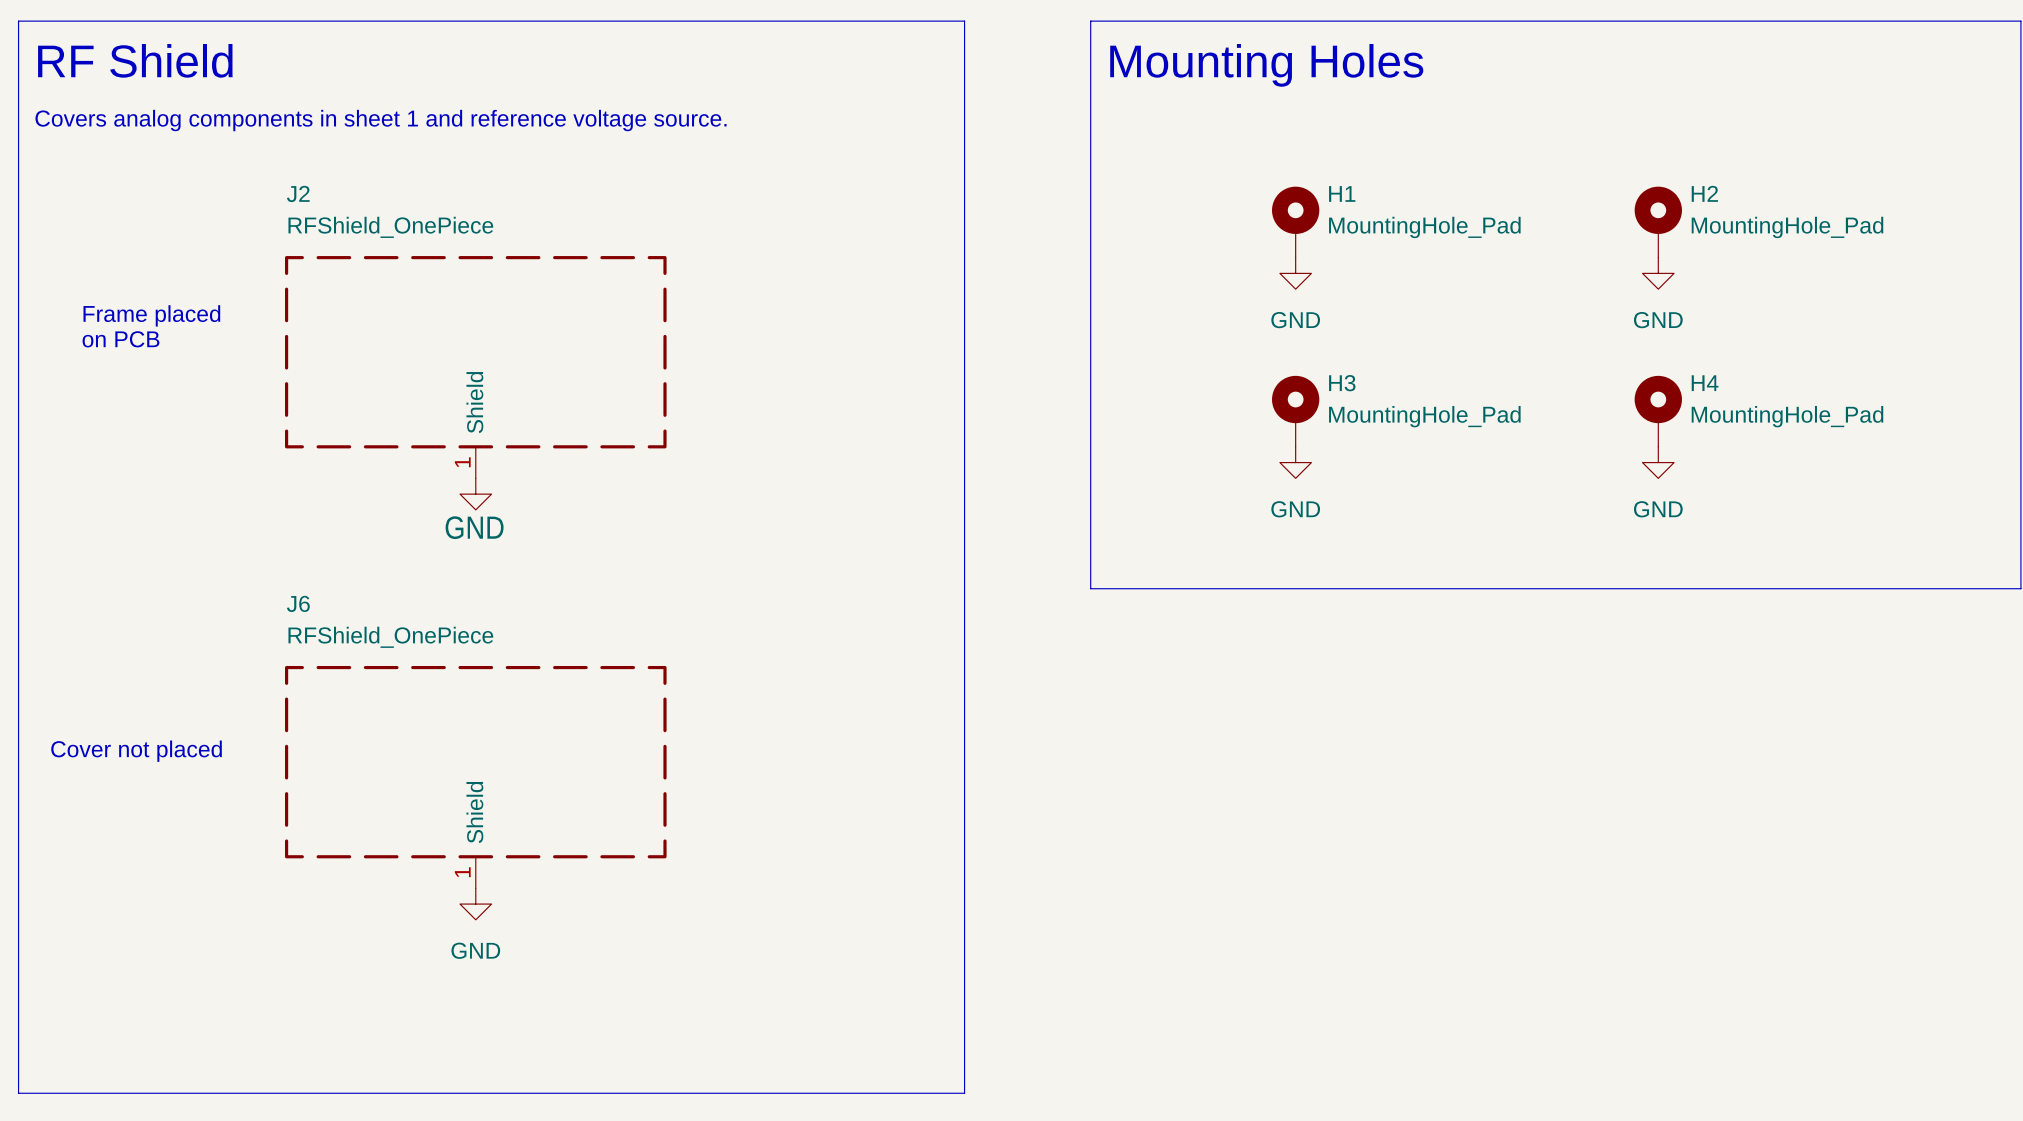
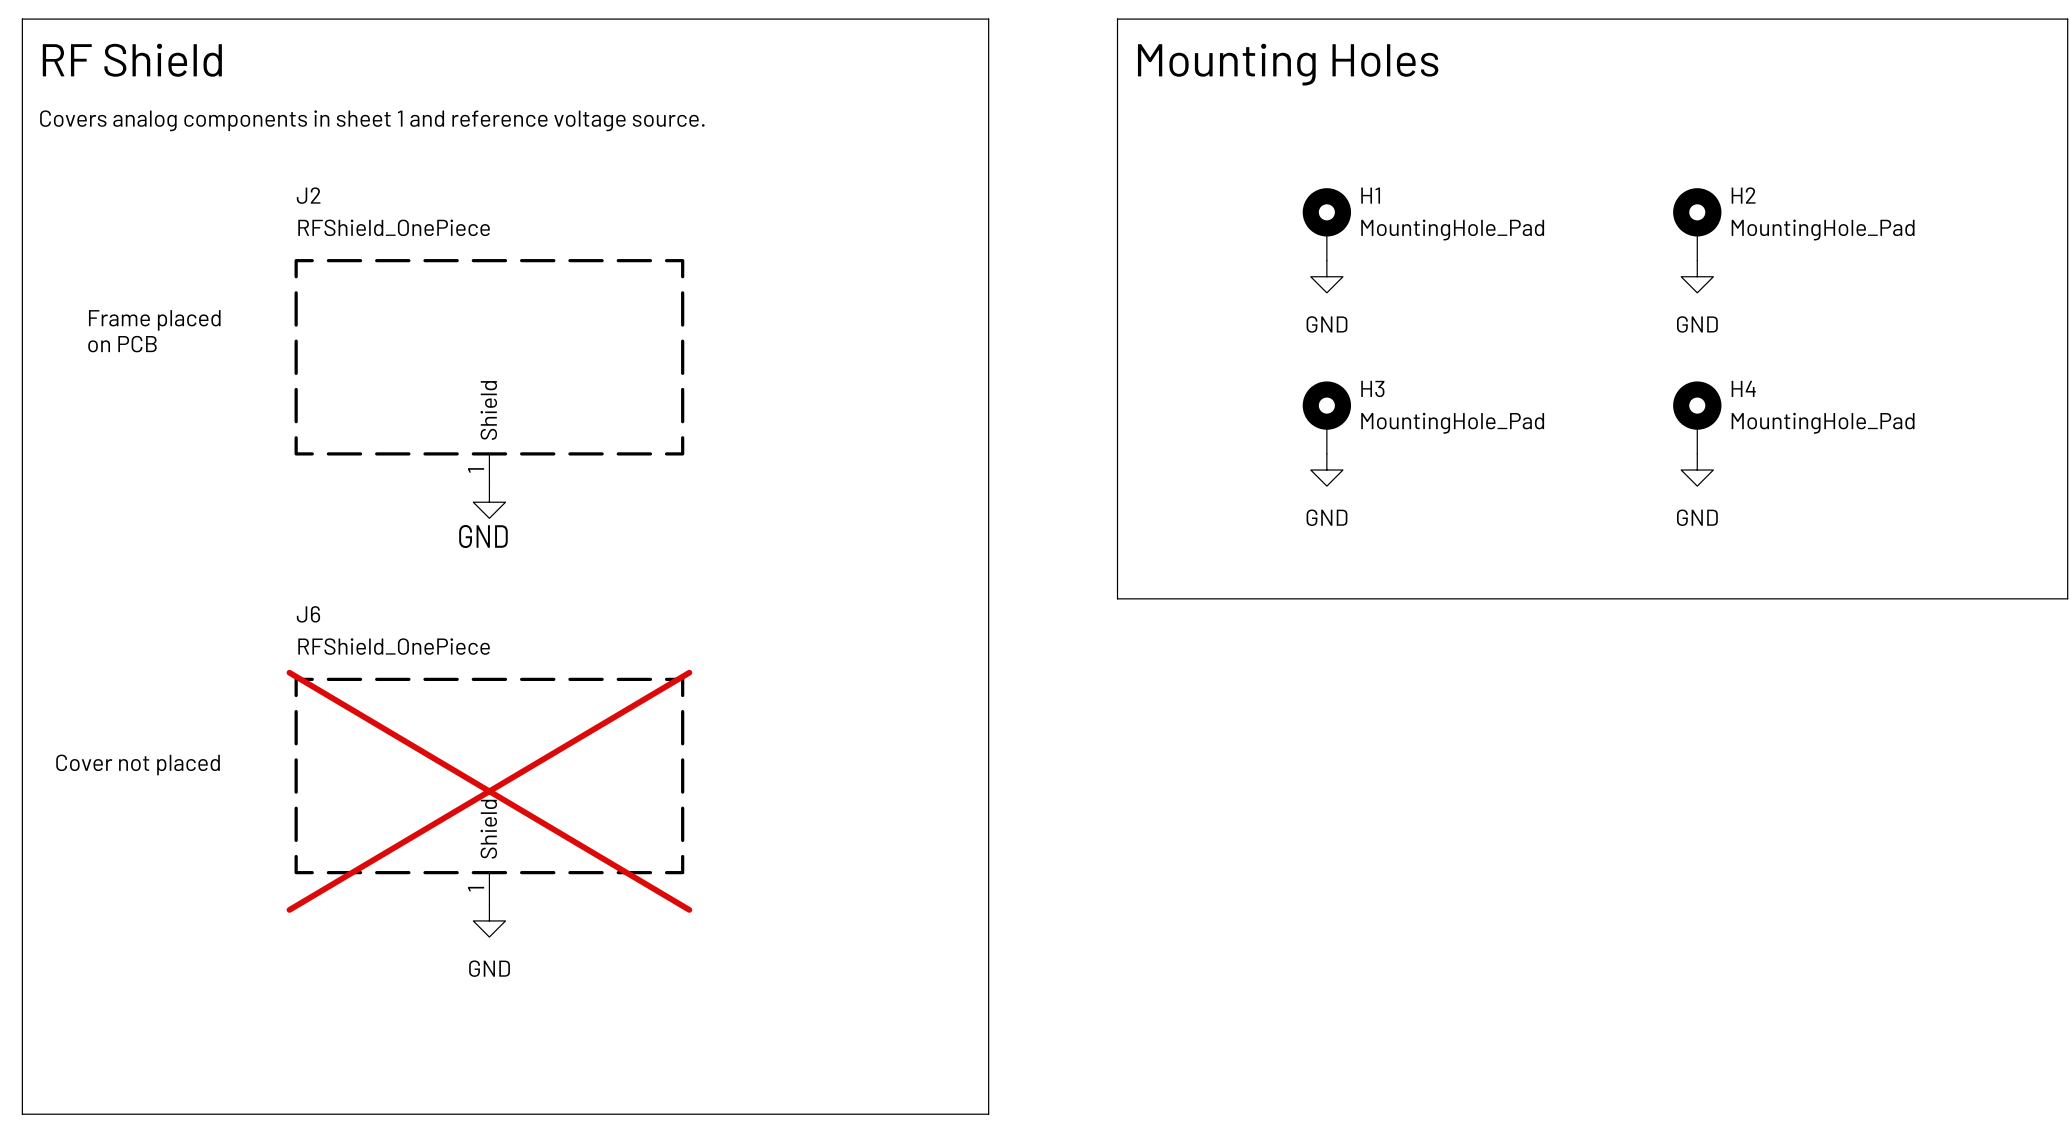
J6 do-not-place cross: none -> (489, 791)

